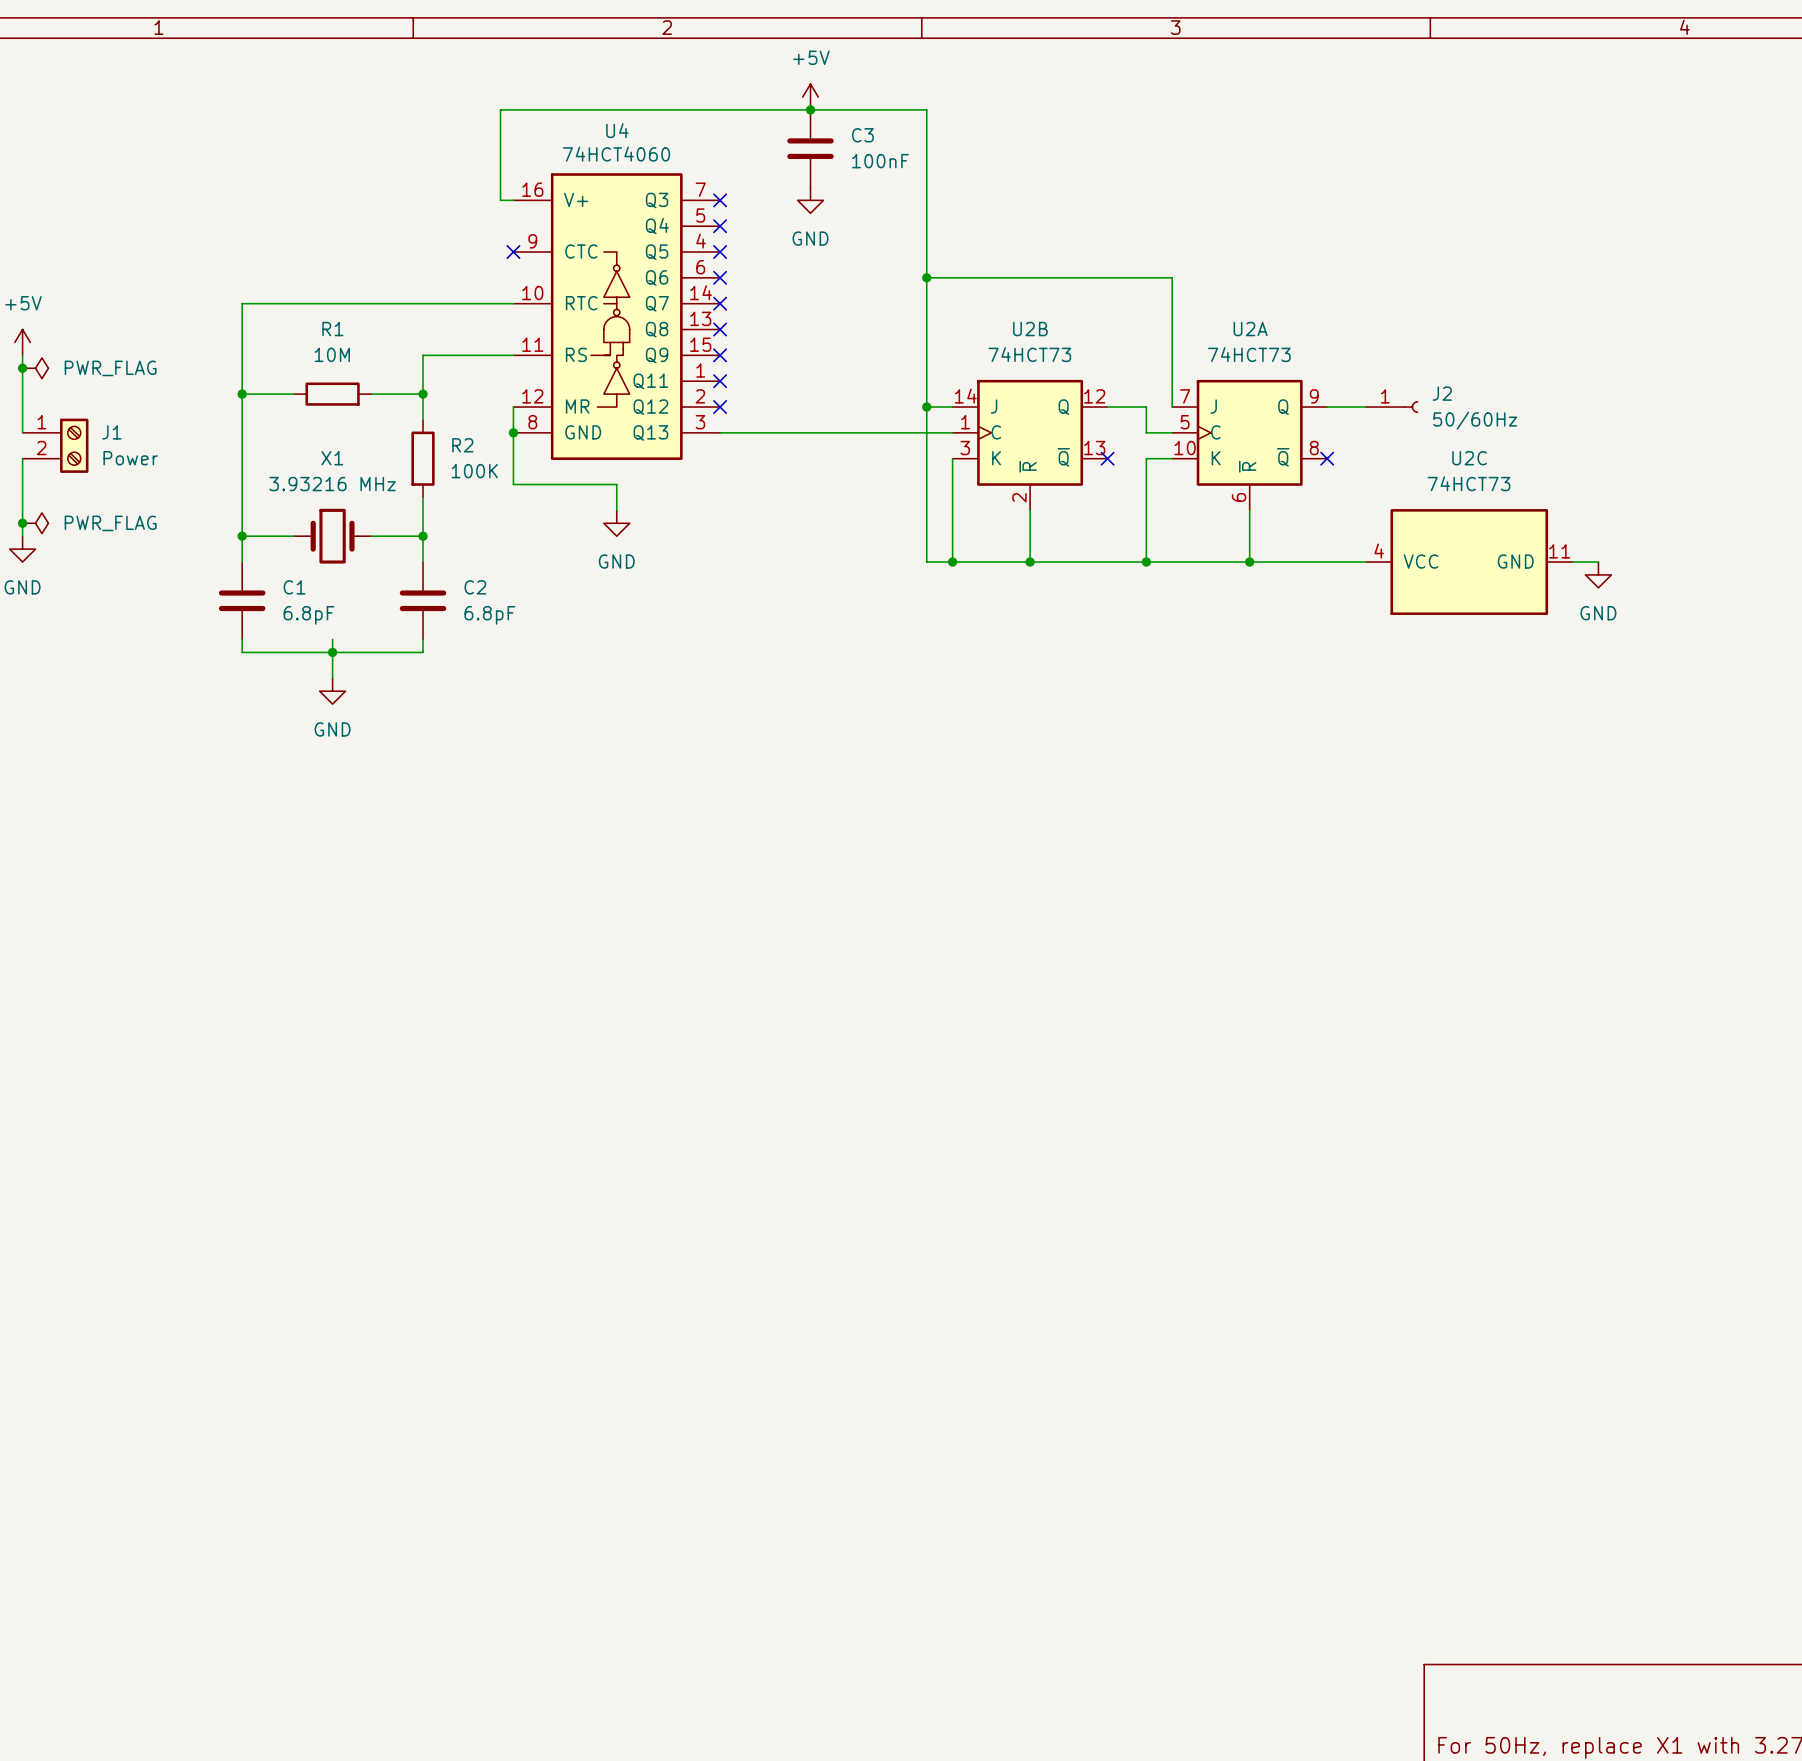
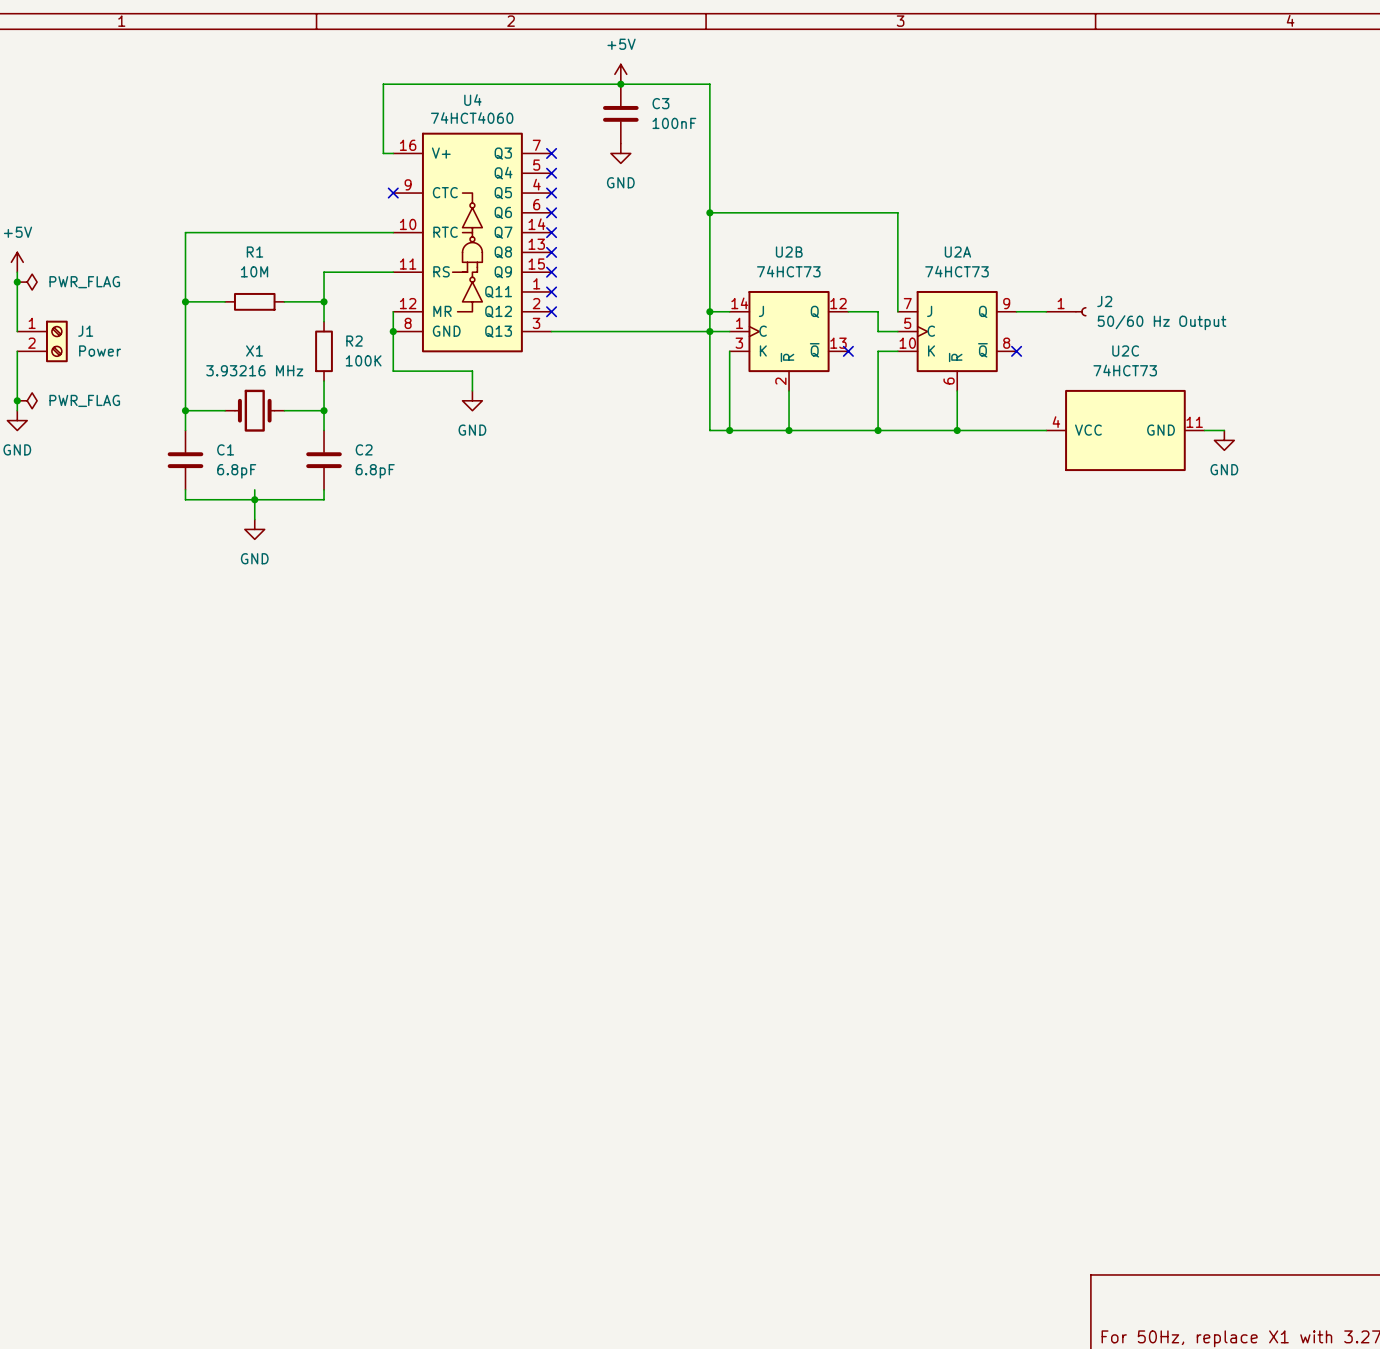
J2 value: 50/60Hz (1475, 420) -> 50/60 Hz Output (1162, 322)
junction: none -> (709, 331)

